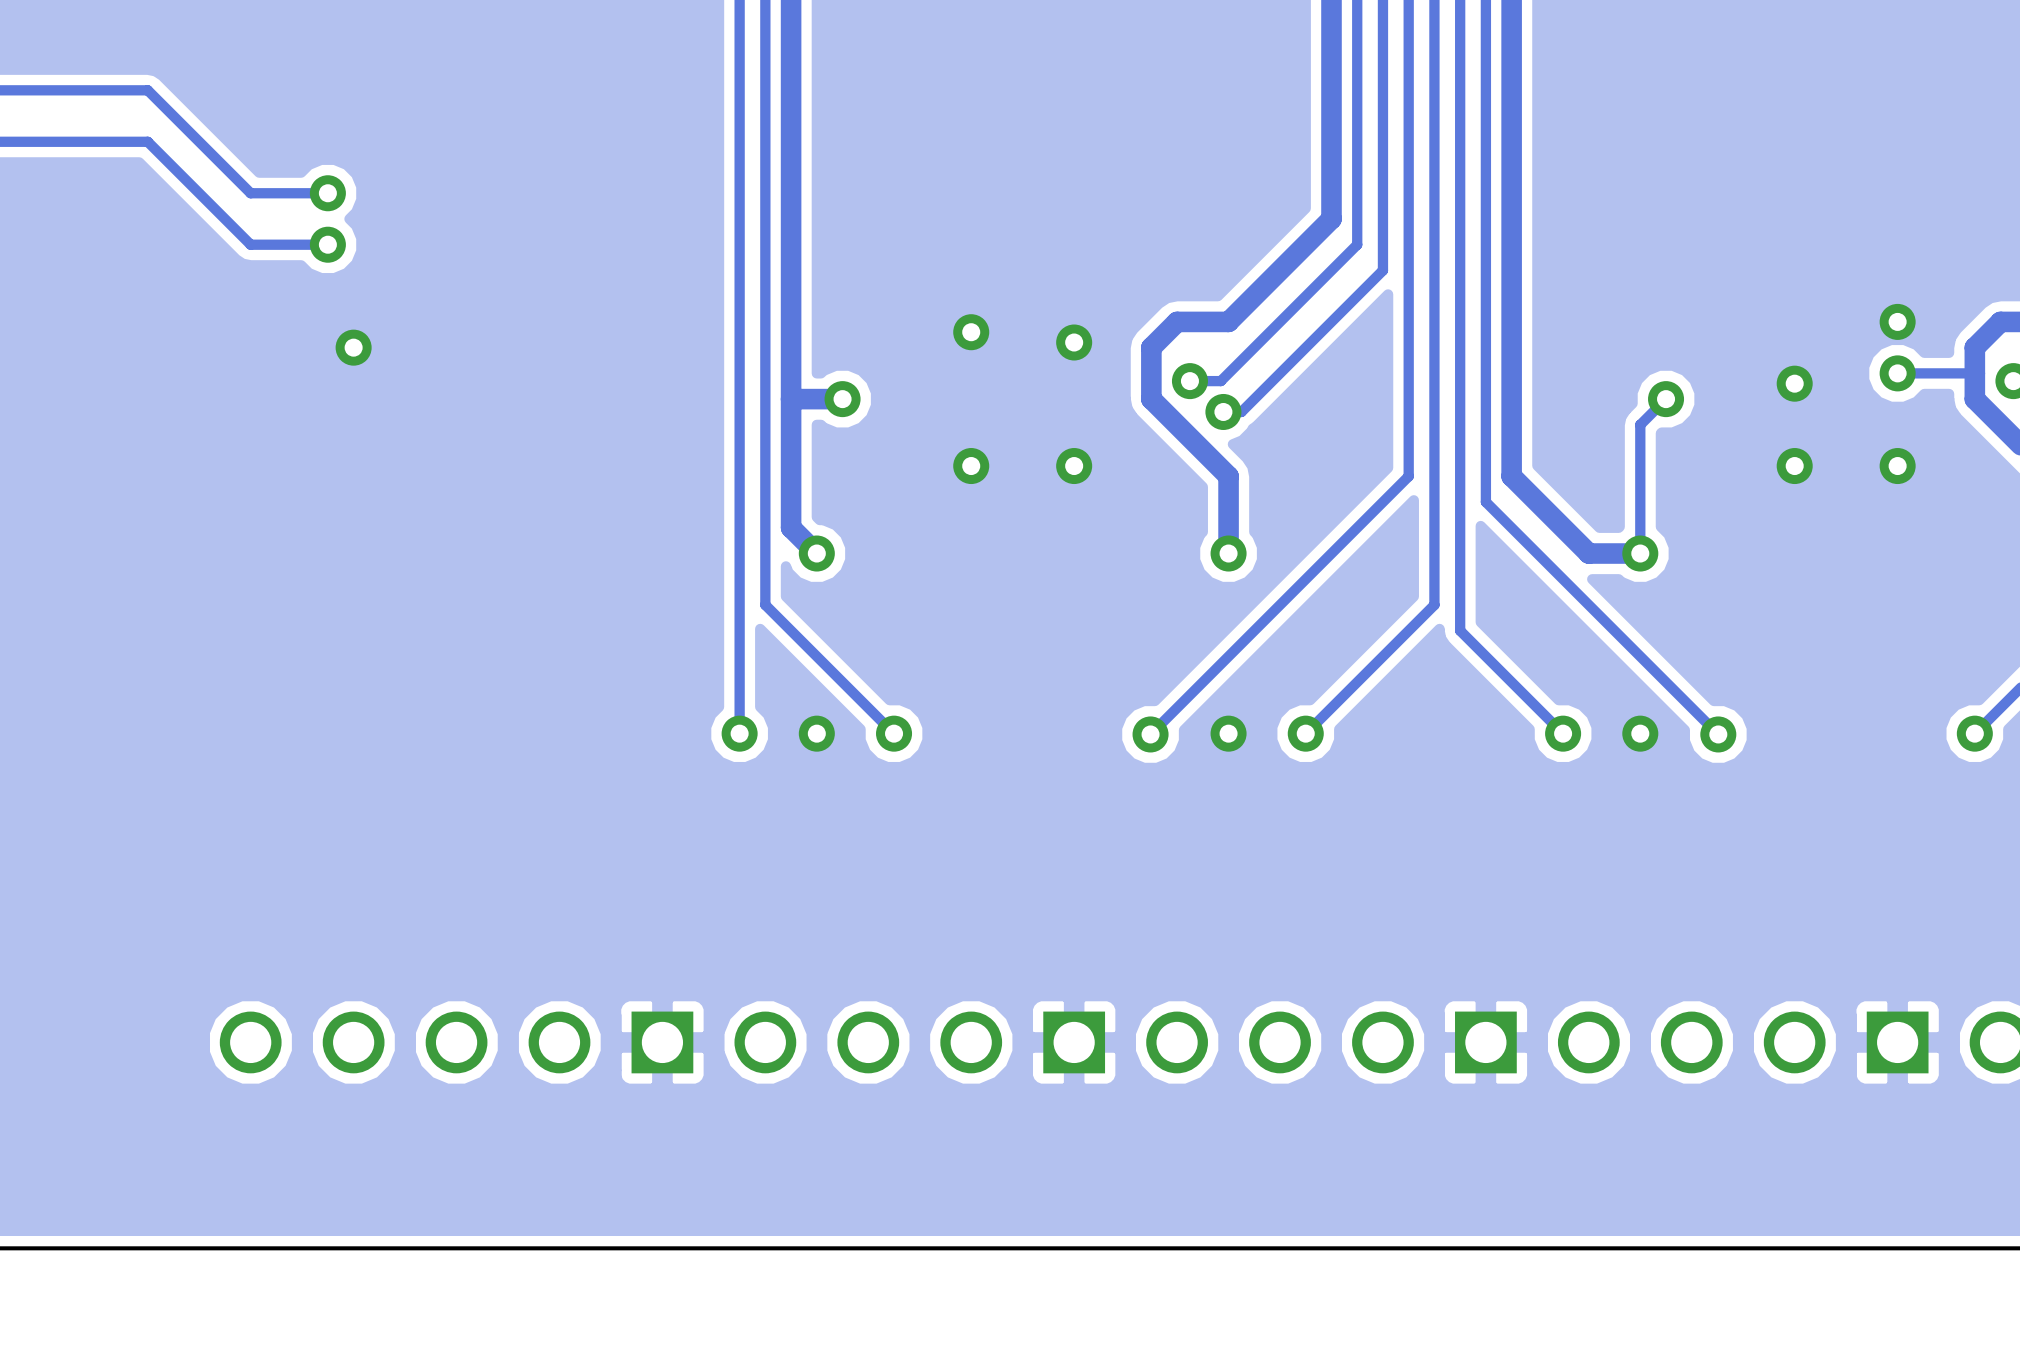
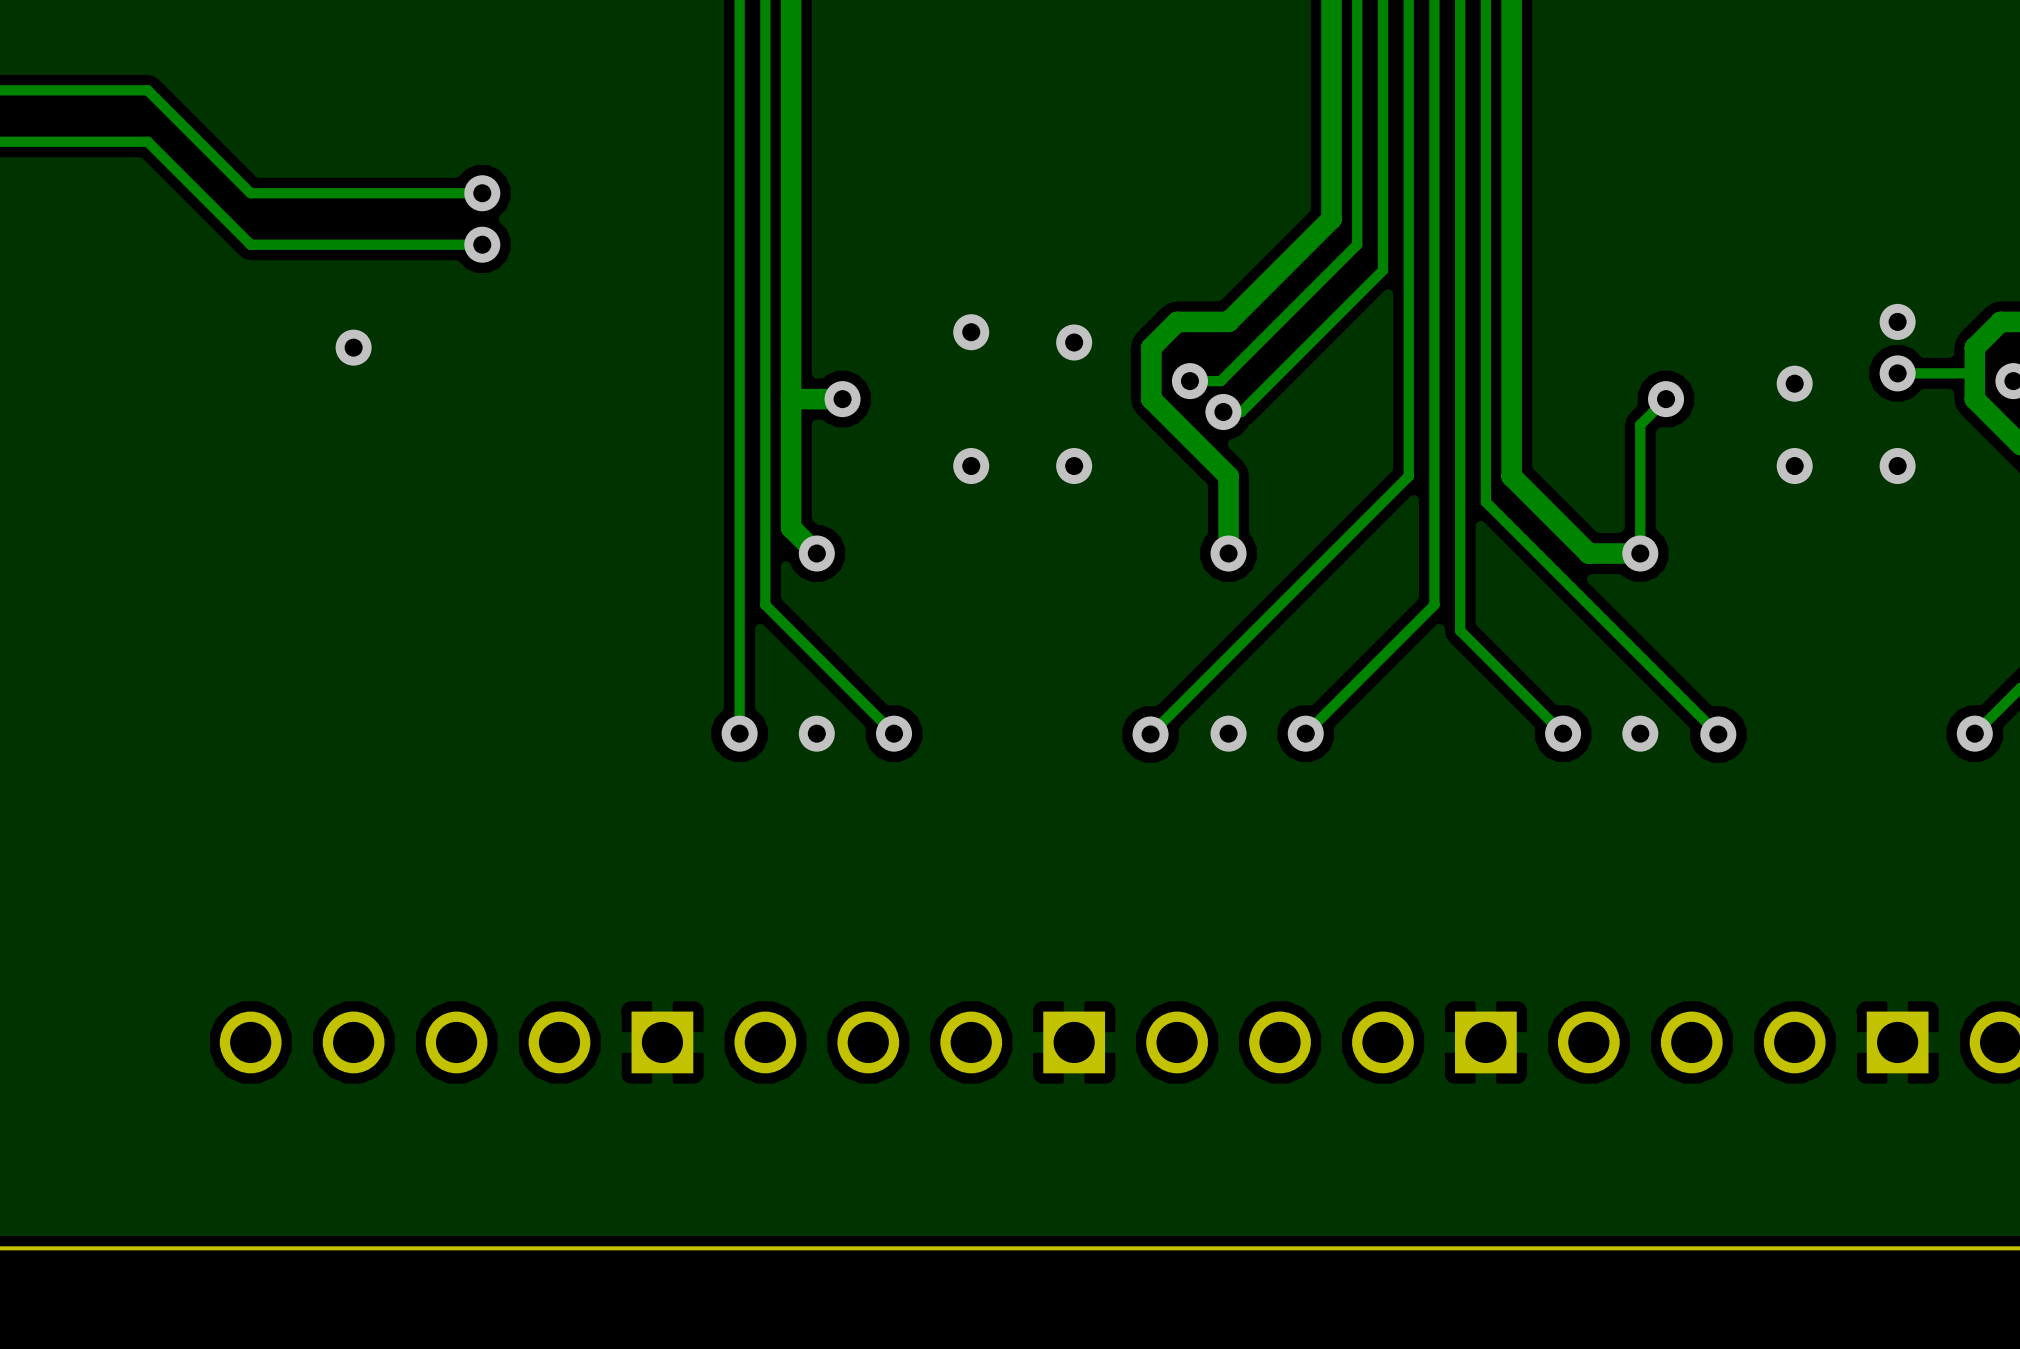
via: (327, 193) -> none
track: none -> (482, 193) (327, 193)
via: none -> (482, 193)
via: (327, 244) -> none
track: none -> (482, 244) (327, 244)
via: none -> (482, 244)

